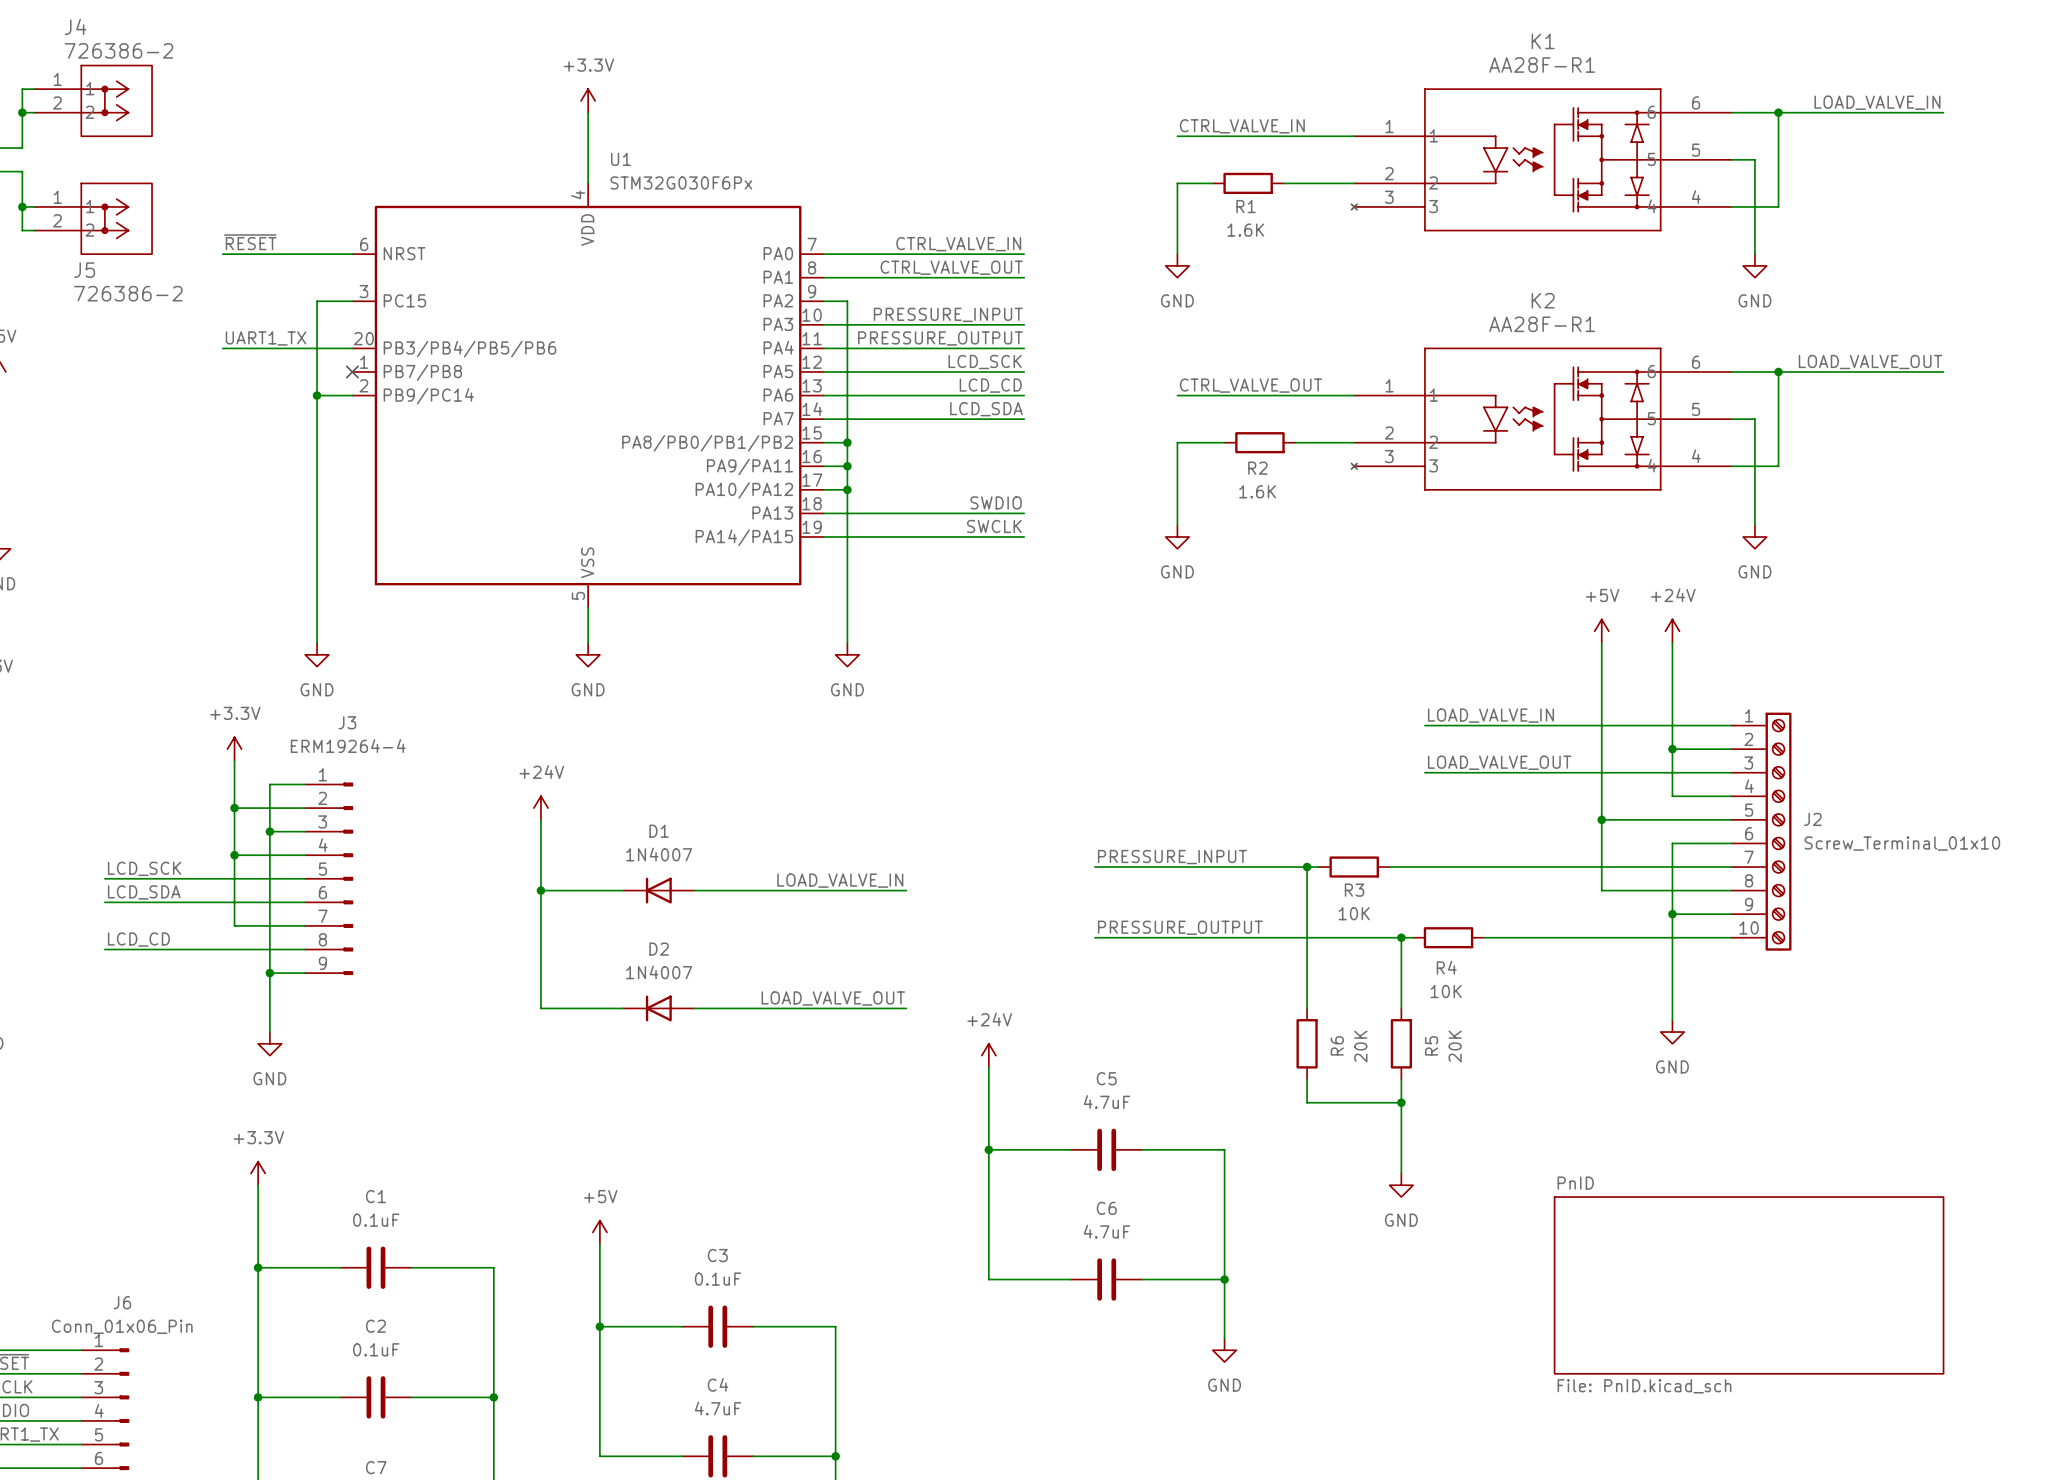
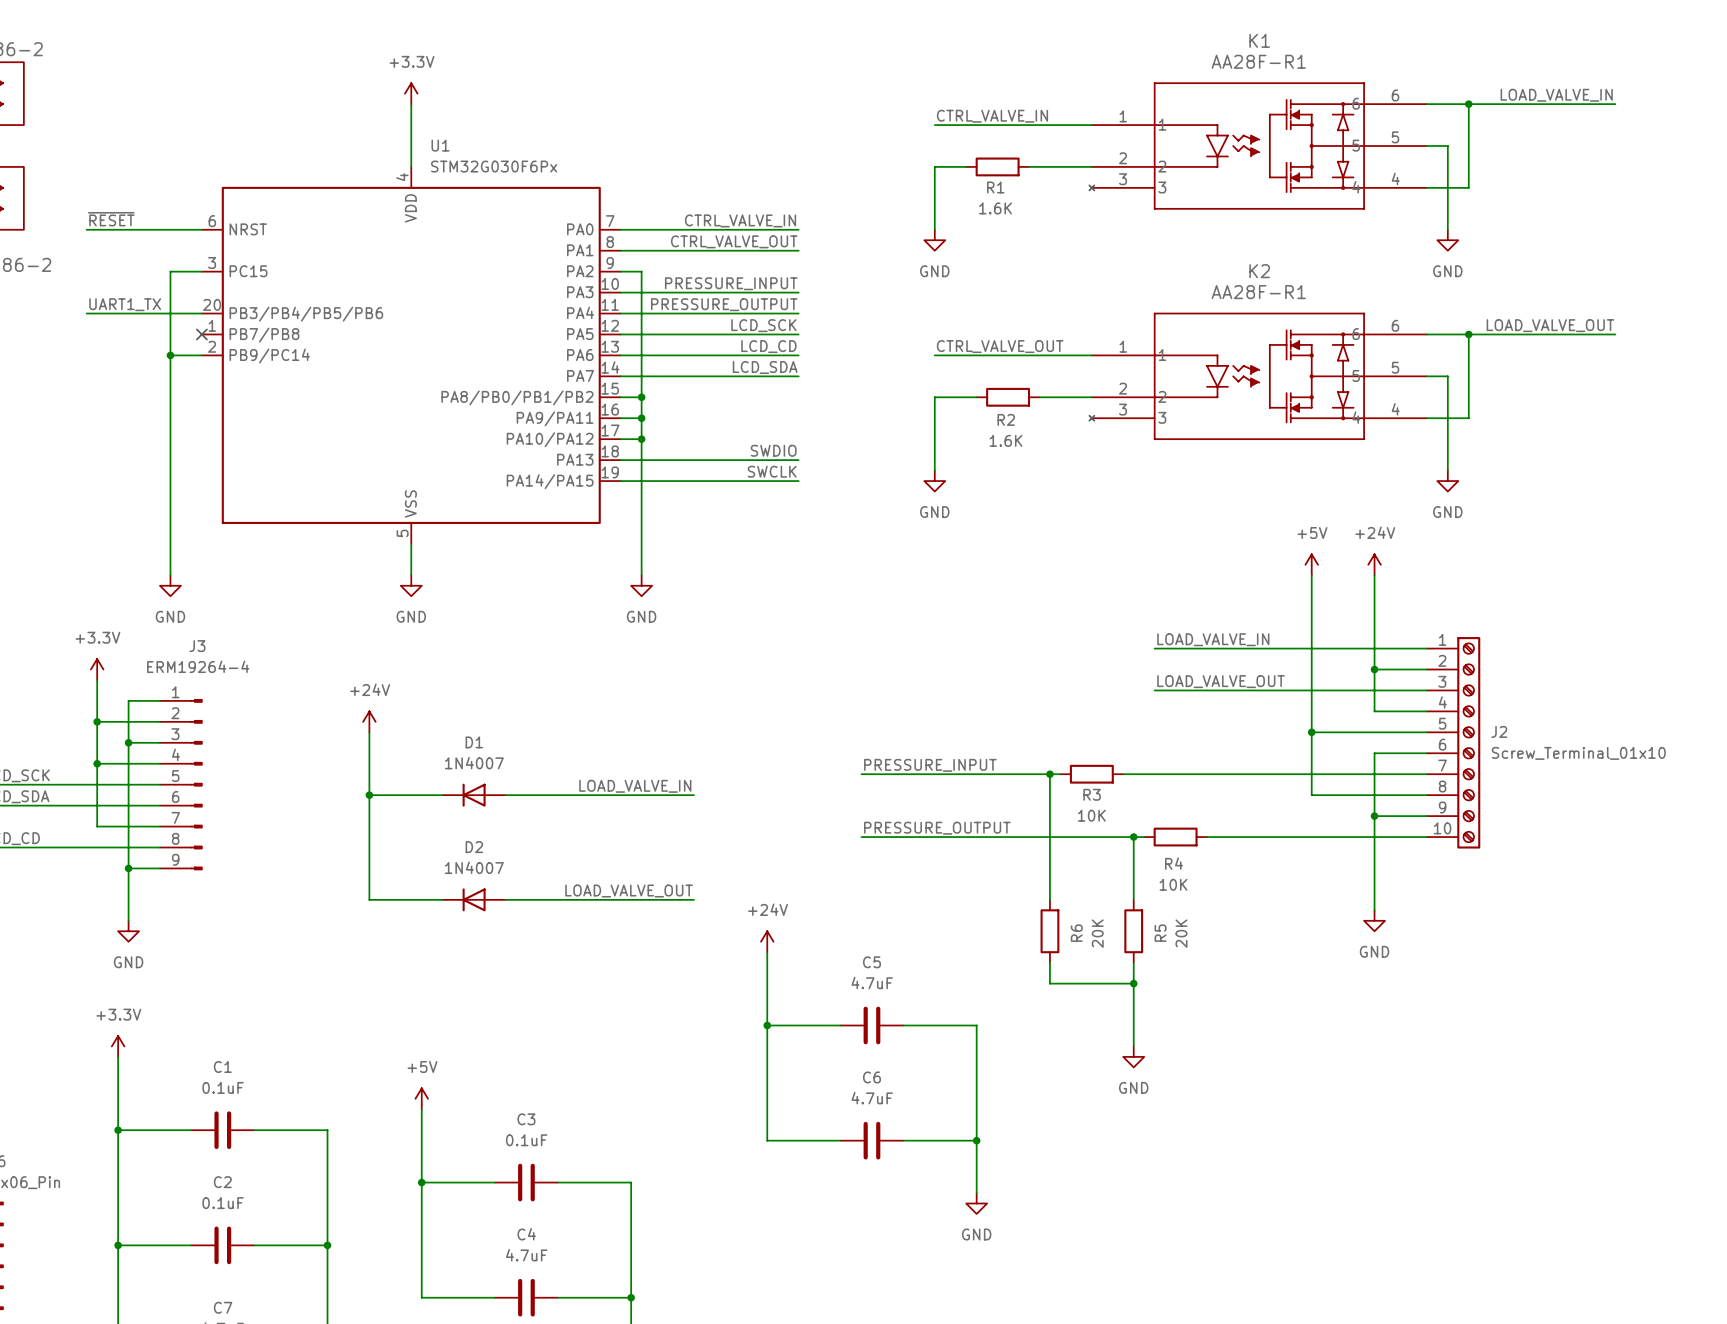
sheet PnID: File: PnID.kicad_sch (1749, 1285) -> none

